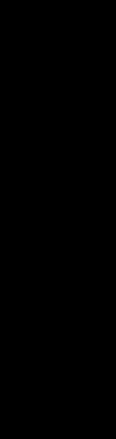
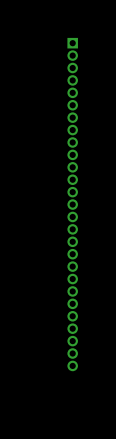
part: none -> (72, 204)

